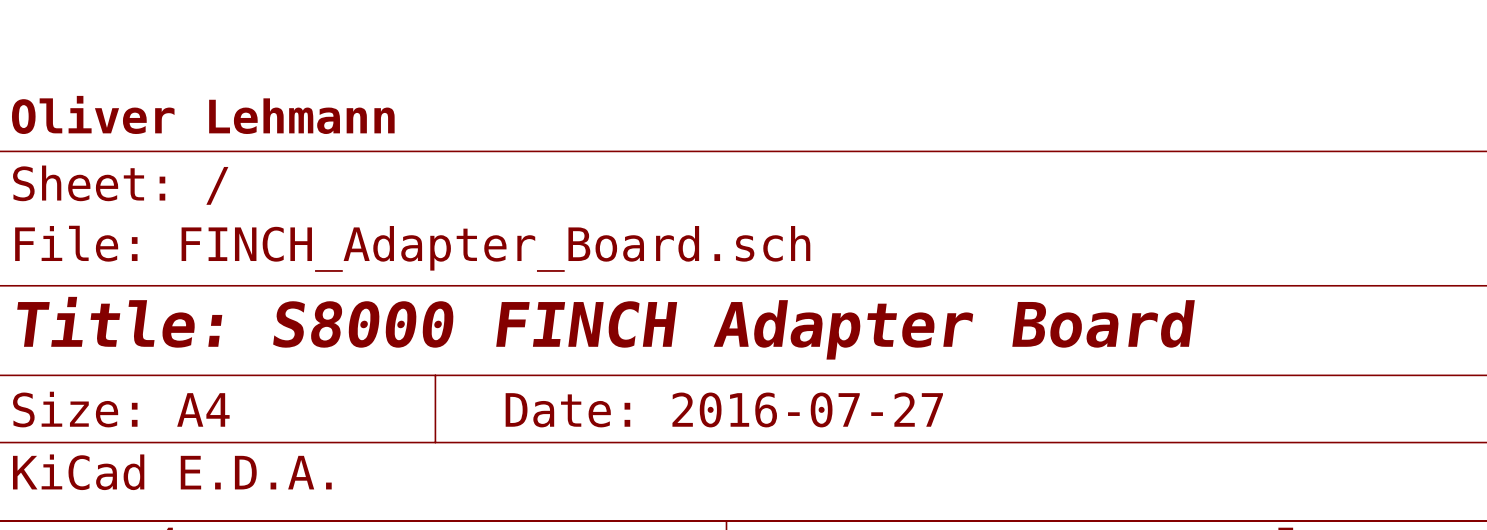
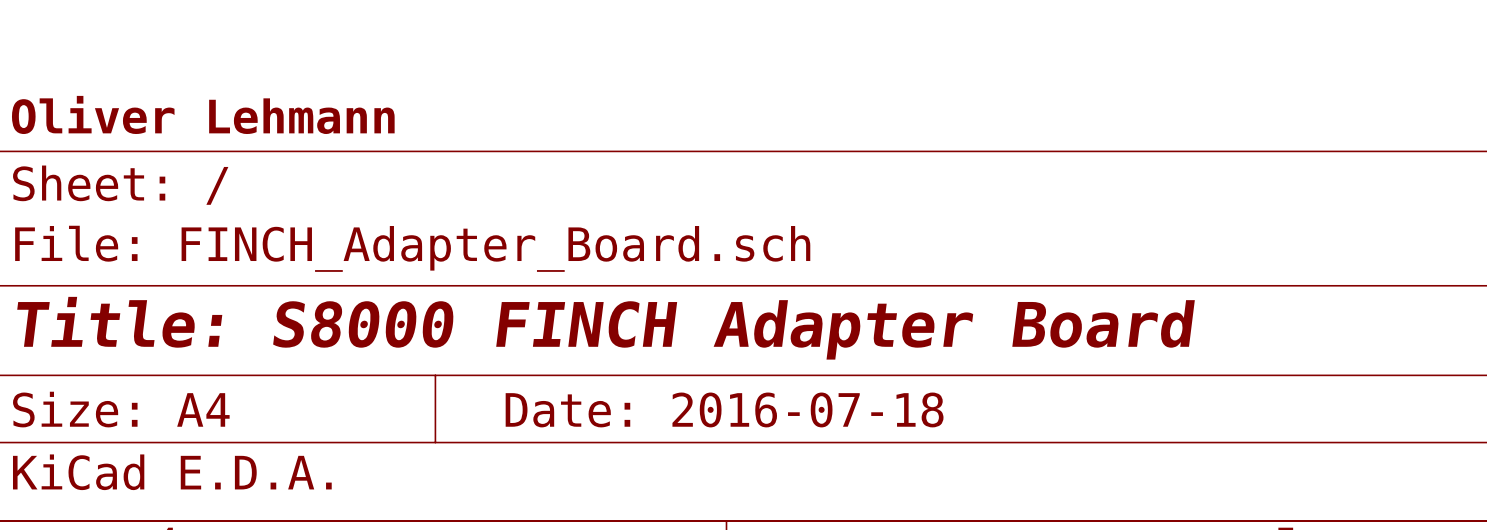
title block: Date: 2016-07-27 (724, 409) -> Date: 2016-07-18 (724, 409)

